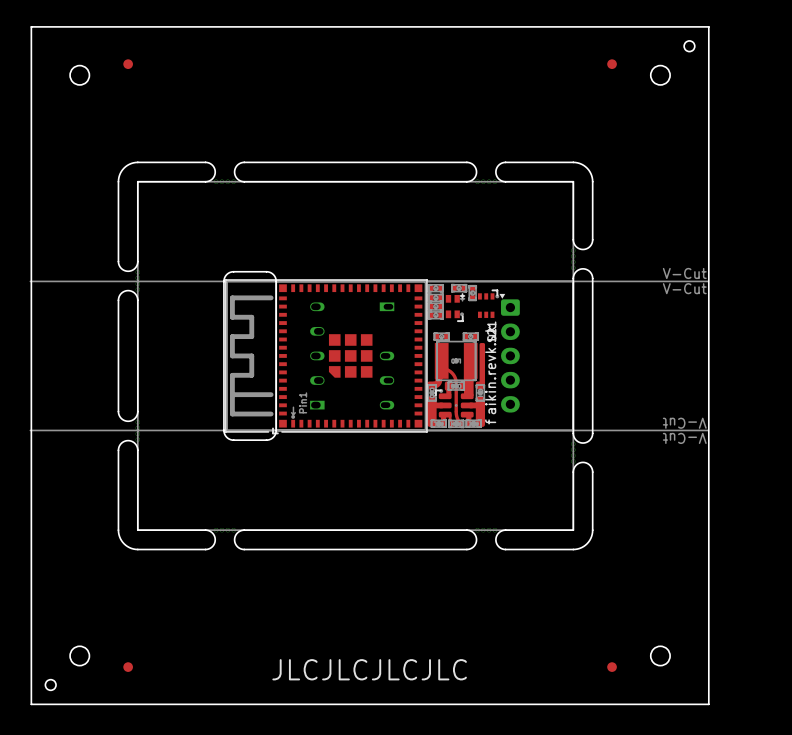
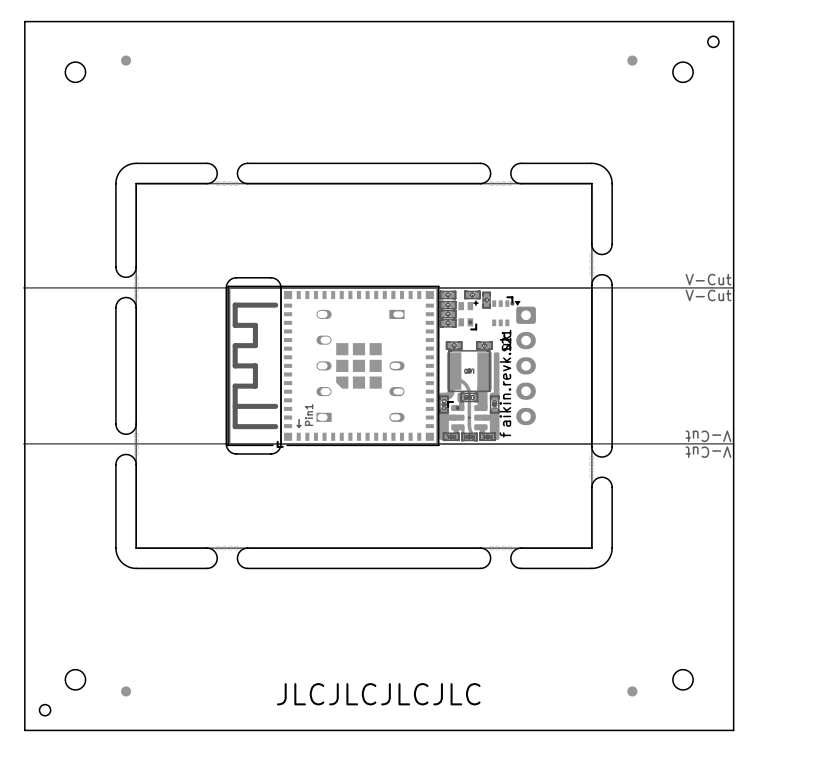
part footprint: [225, 279, 428, 435] -> [227, 285, 440, 448]
part footprint: [445, 293, 466, 323] -> [458, 300, 479, 331]
part footprint: [427, 343, 486, 427] -> [439, 352, 500, 441]

